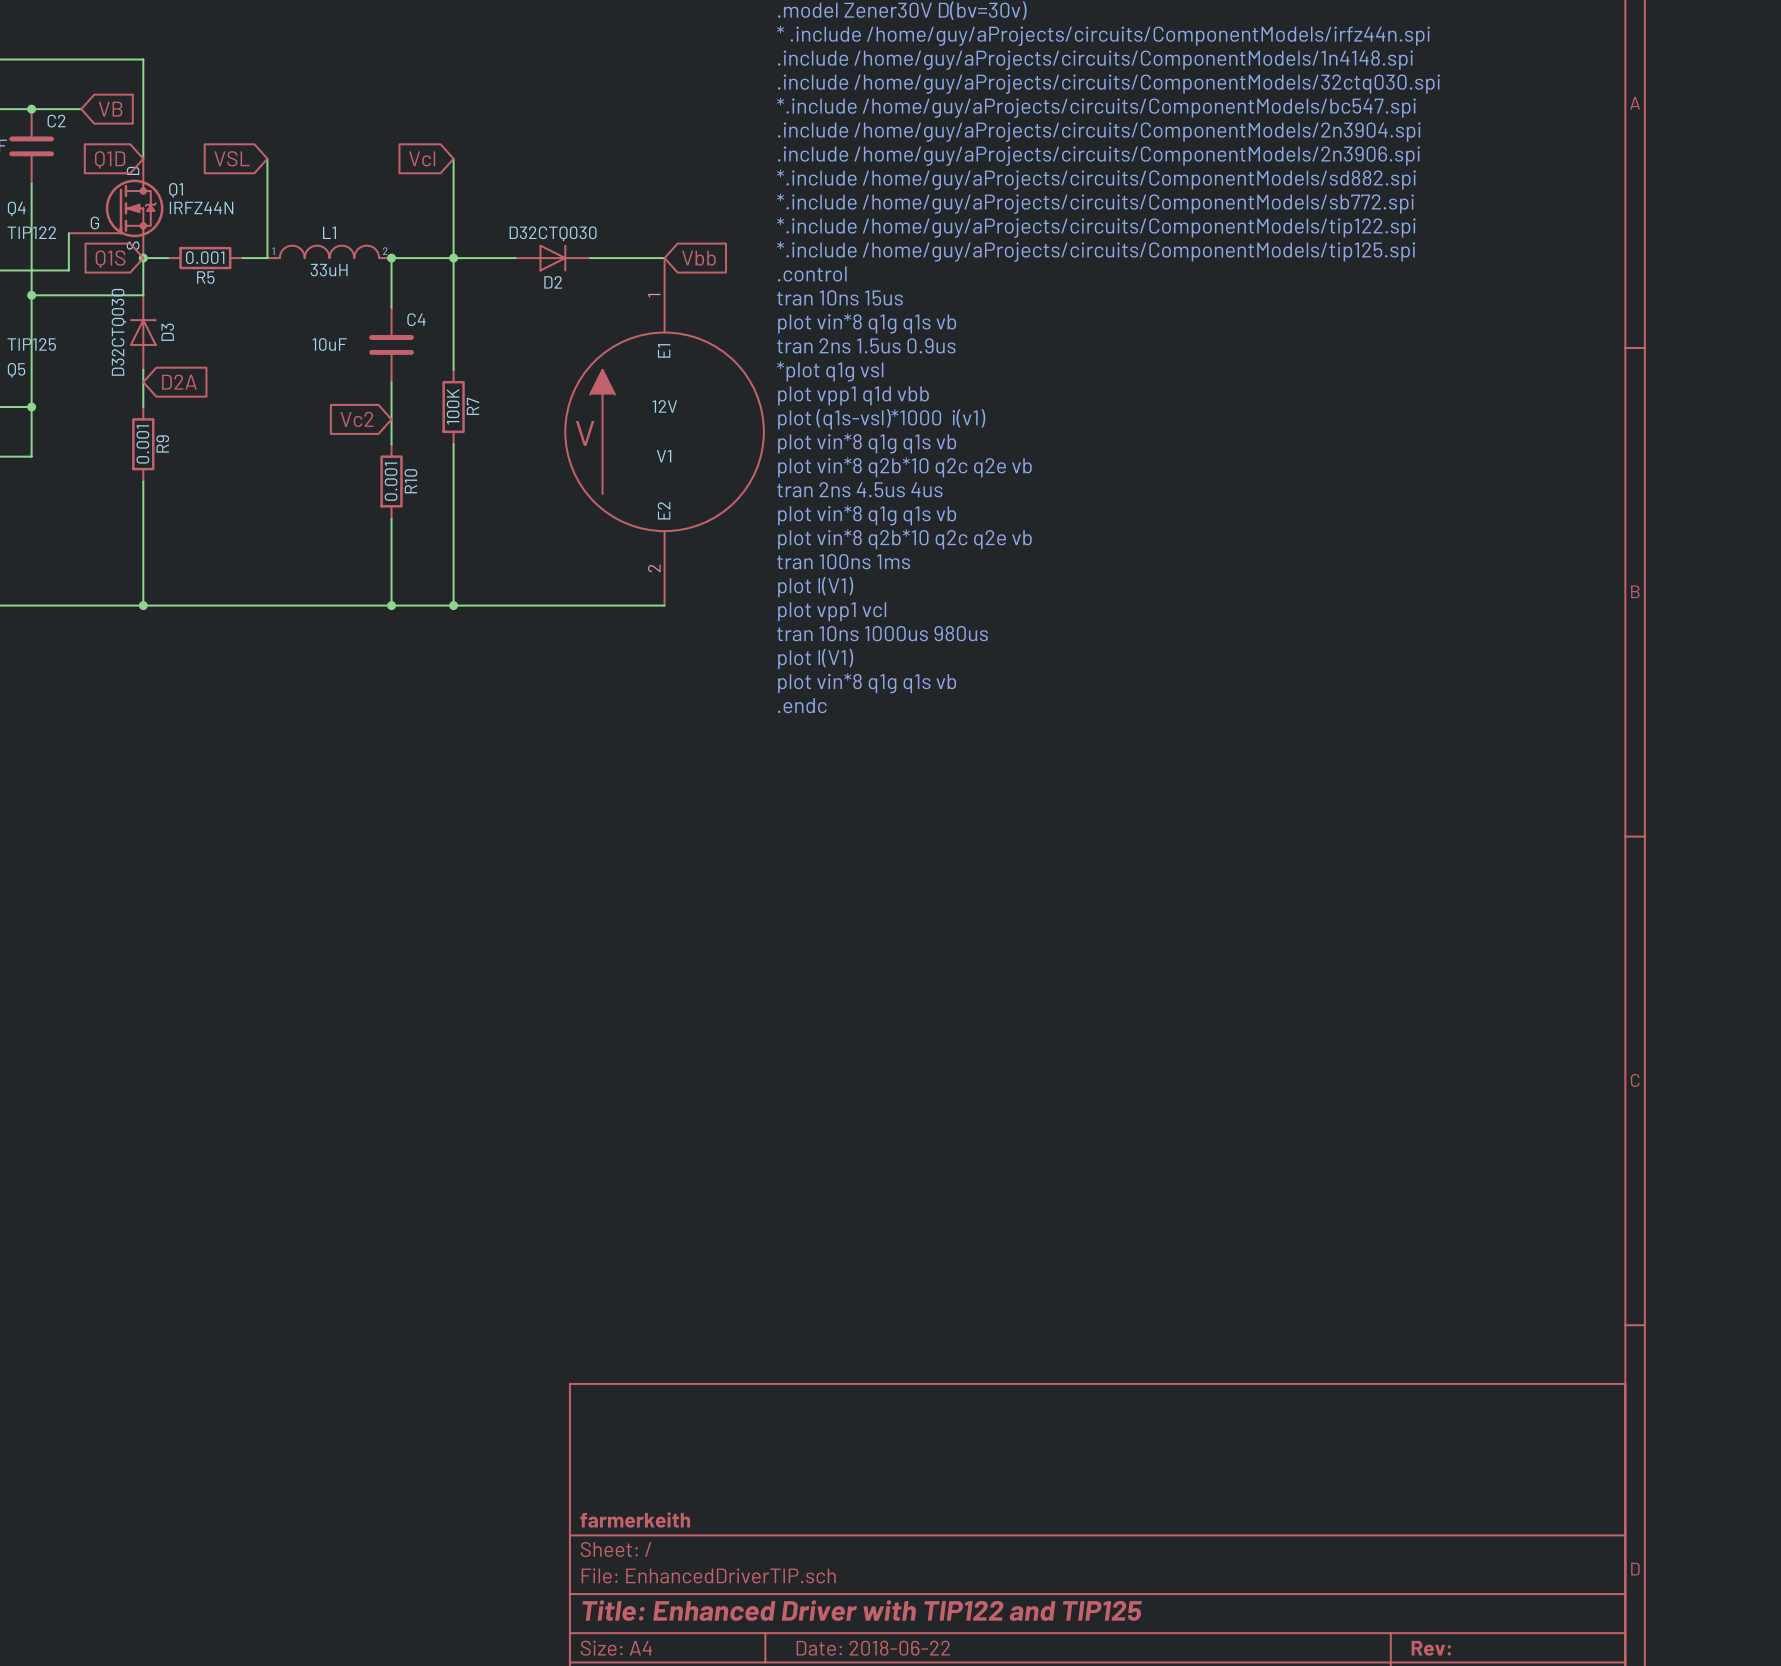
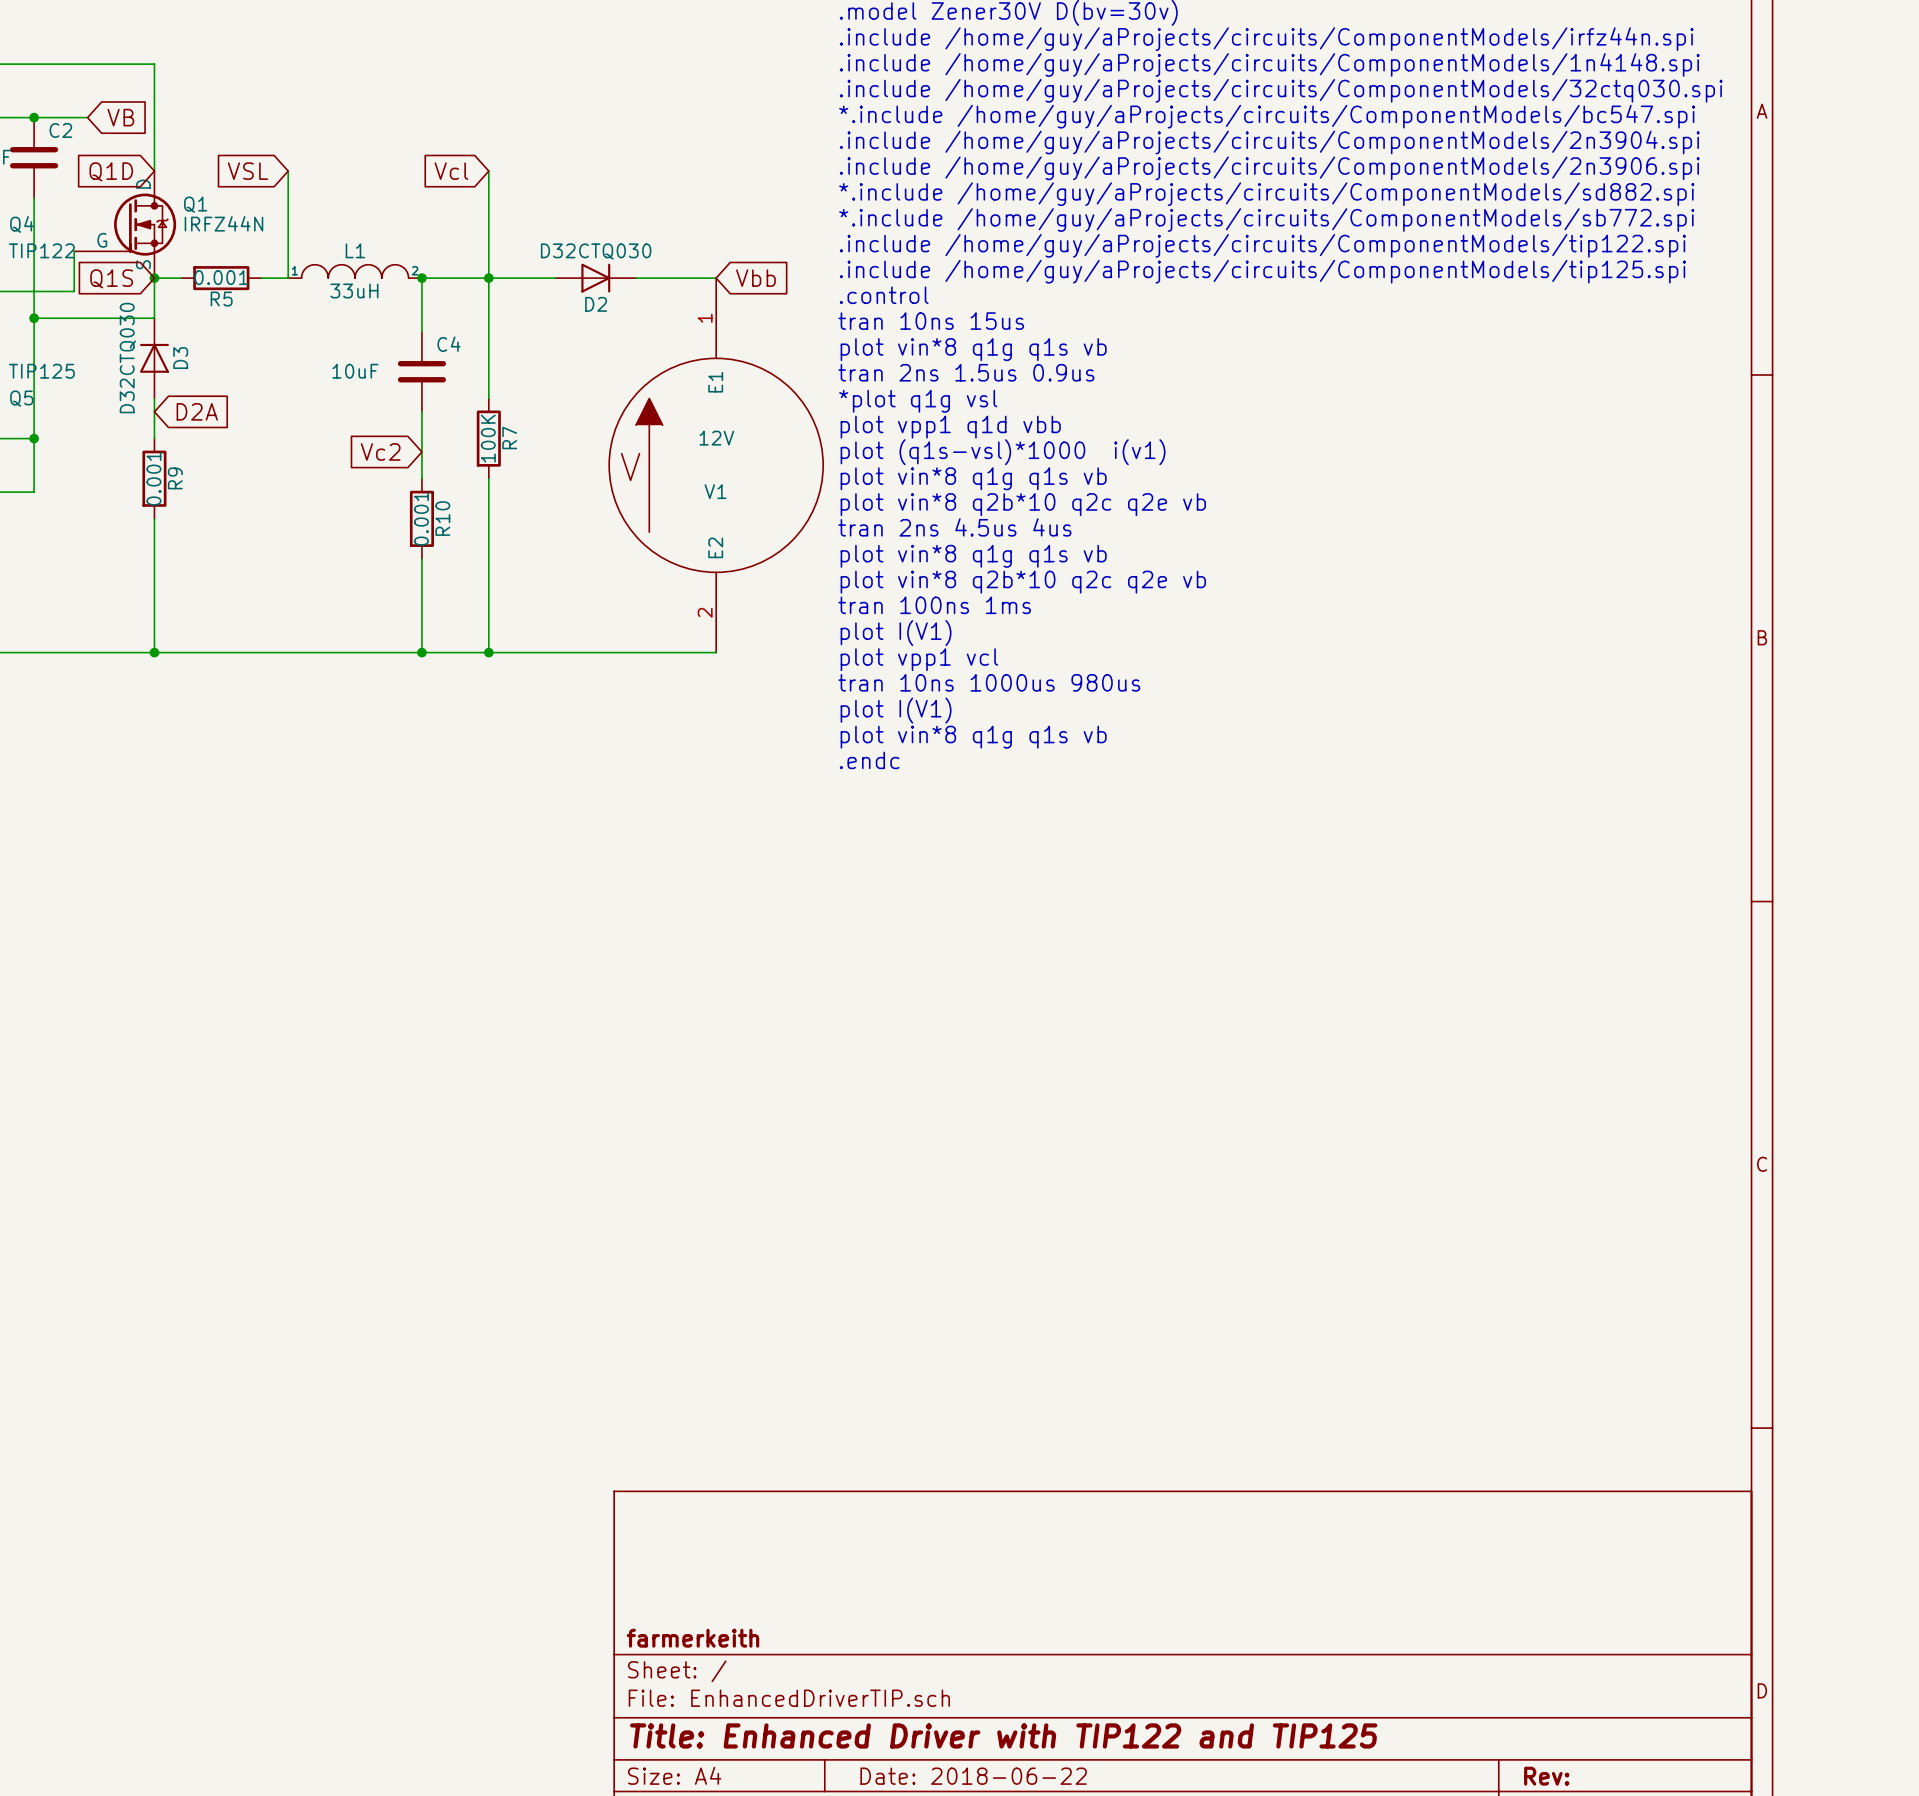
text: * .include /home/guy/aProjects/circuits/ComponentModels/irfz44n.spi (1103, 35) -> .include /home/guy/aProjects/circuits/ComponentModels/irfz44n.spi (1266, 39)
text: *.include /home/guy/aProjects/circuits/ComponentModels/tip122.spi (1096, 227) -> .include /home/guy/aProjects/circuits/ComponentModels/tip122.spi (1262, 245)
text: *.include /home/guy/aProjects/circuits/ComponentModels/tip125.spi (1096, 251) -> .include /home/guy/aProjects/circuits/ComponentModels/tip125.spi (1262, 271)

